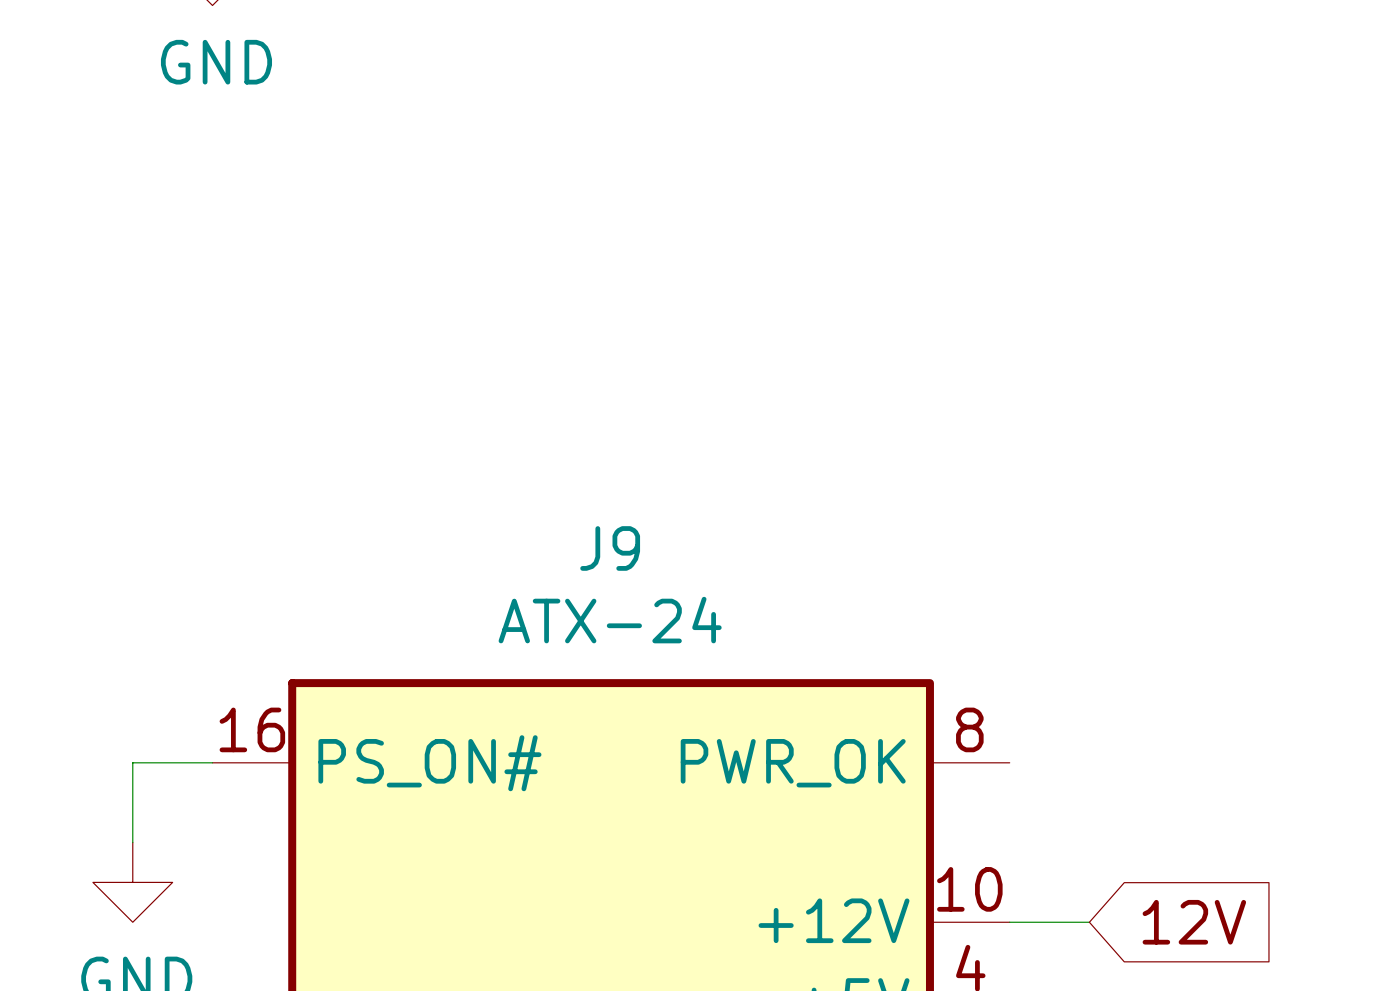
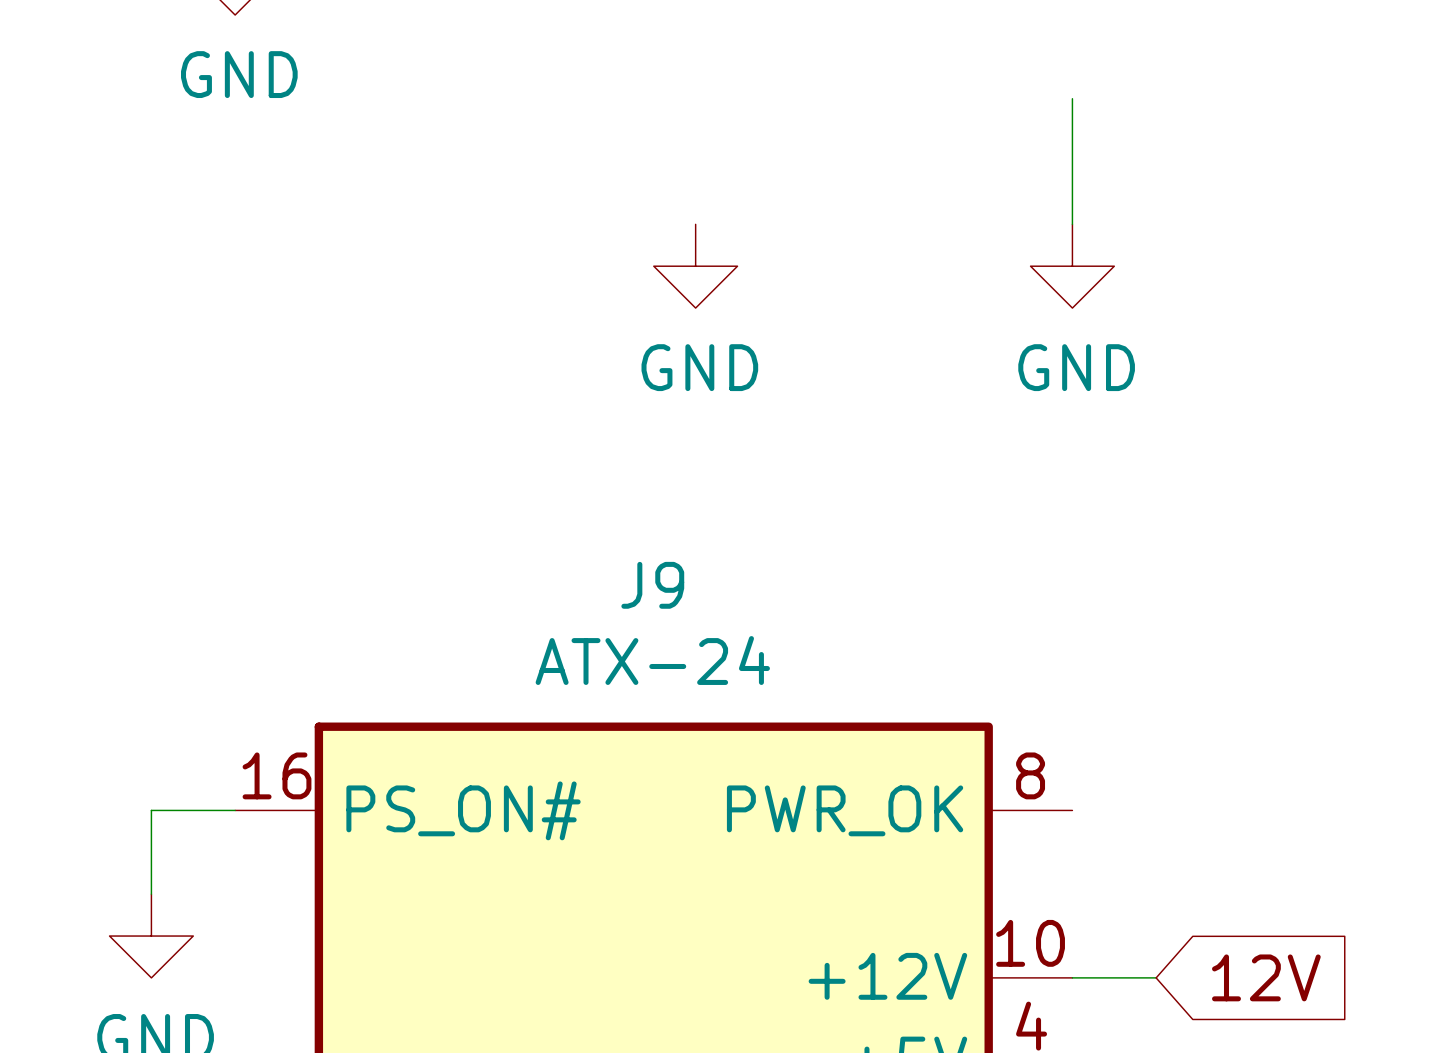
wire: none -> (1072, 98) (1072, 224)
power symbol: none -> GND (695, 266)
power symbol: none -> GND (1072, 266)

